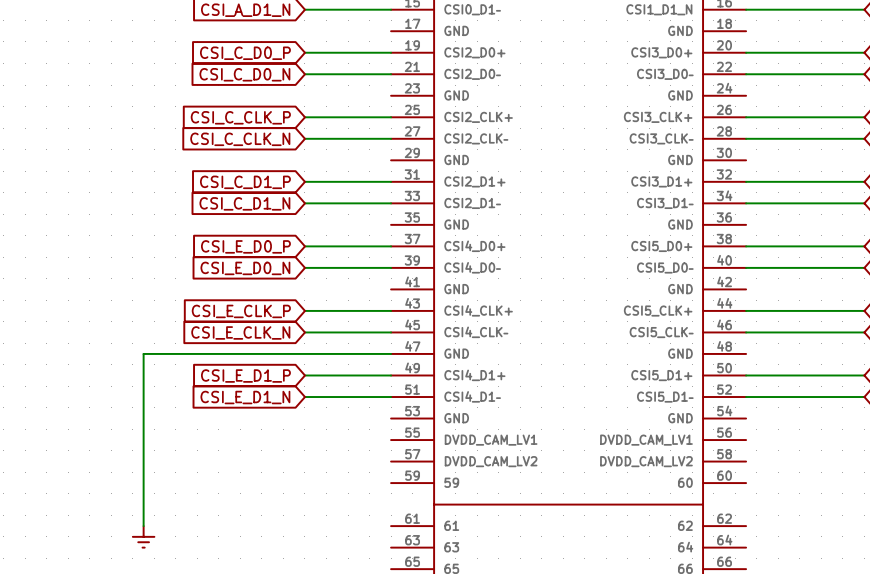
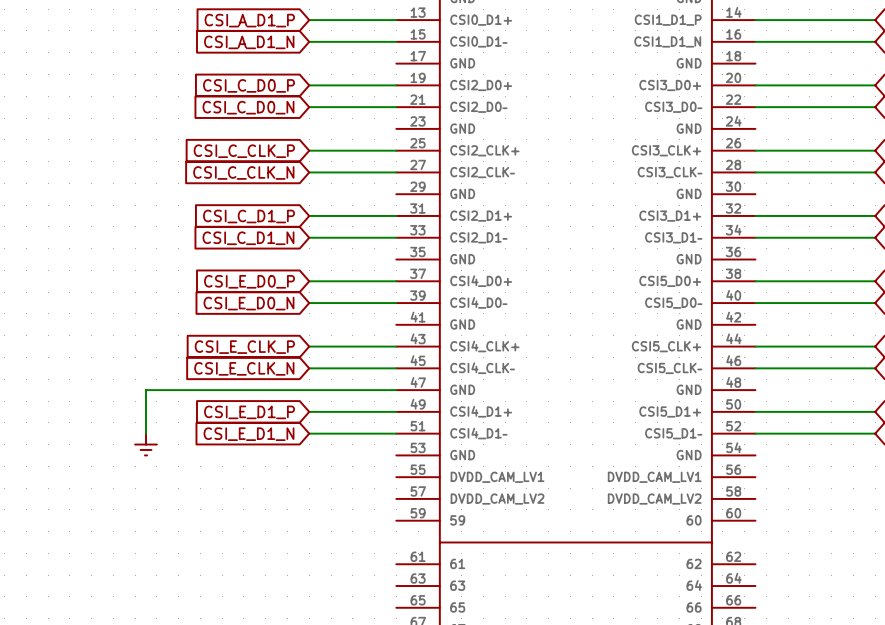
wire: (143, 397) (143, 526) -> none
power symbol position: (143, 536) -> (146, 444)

